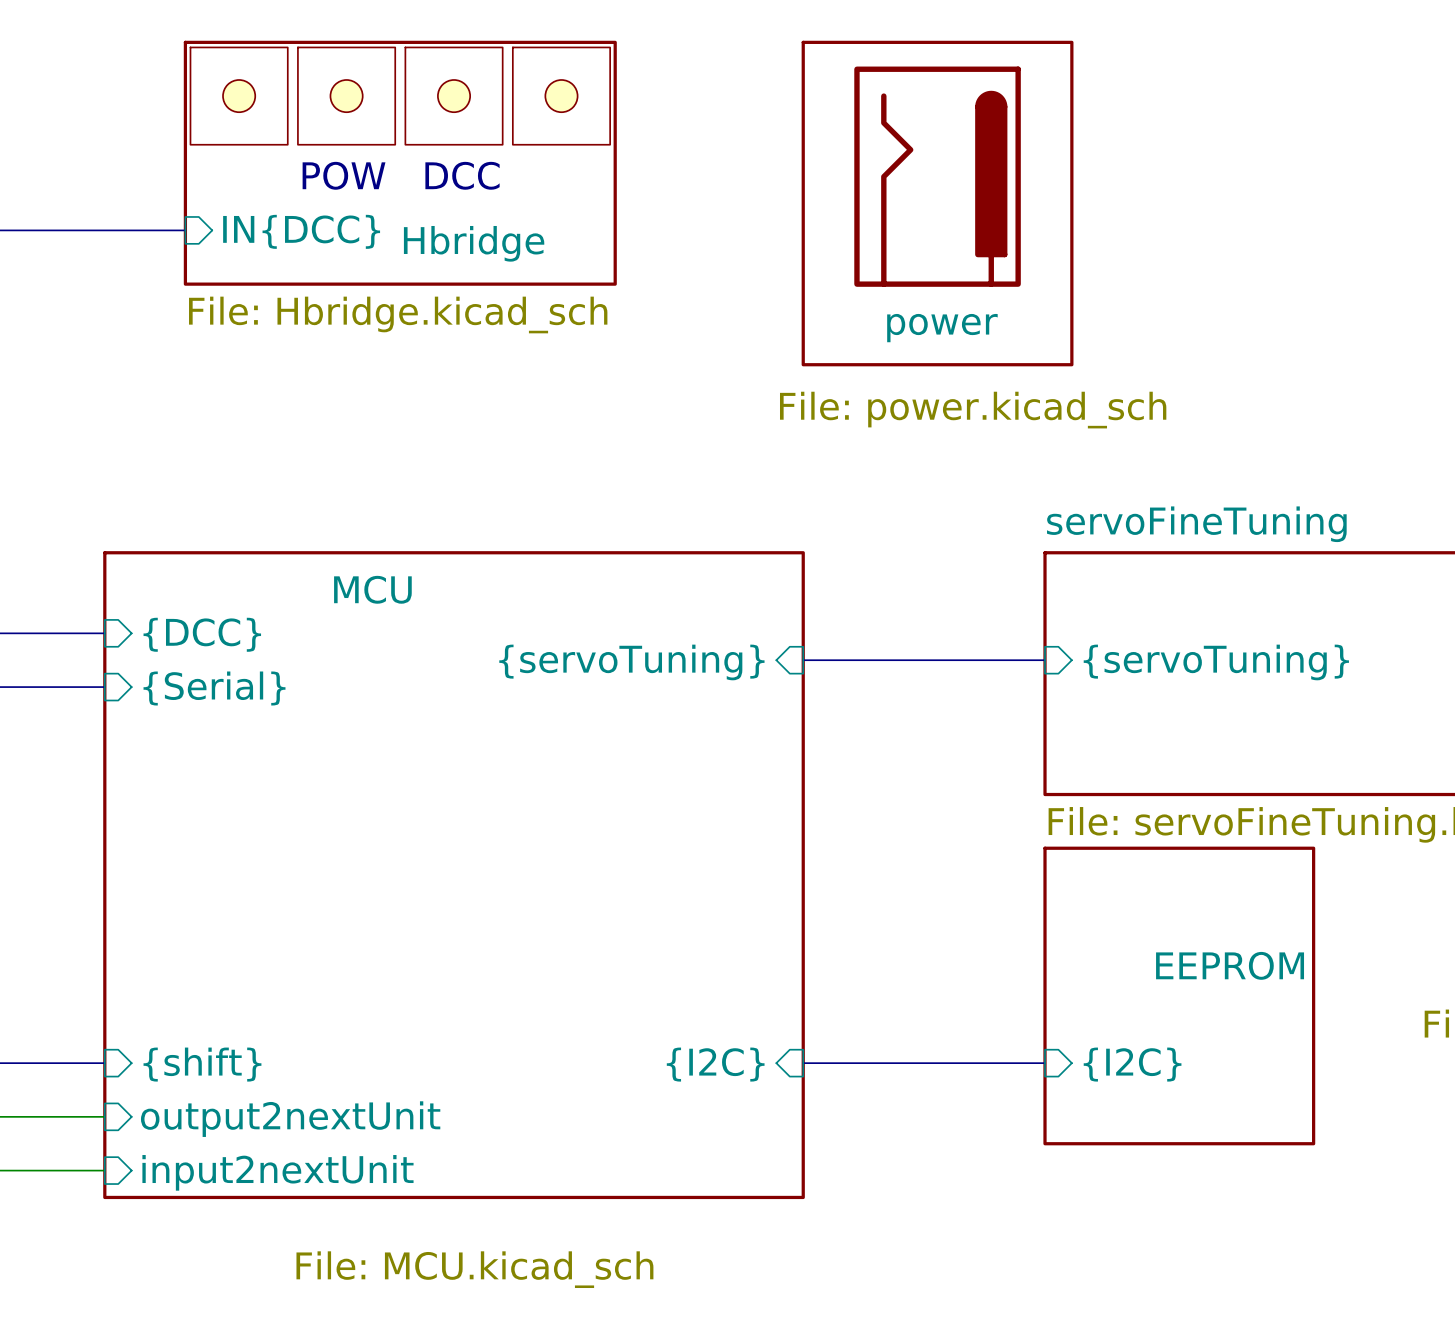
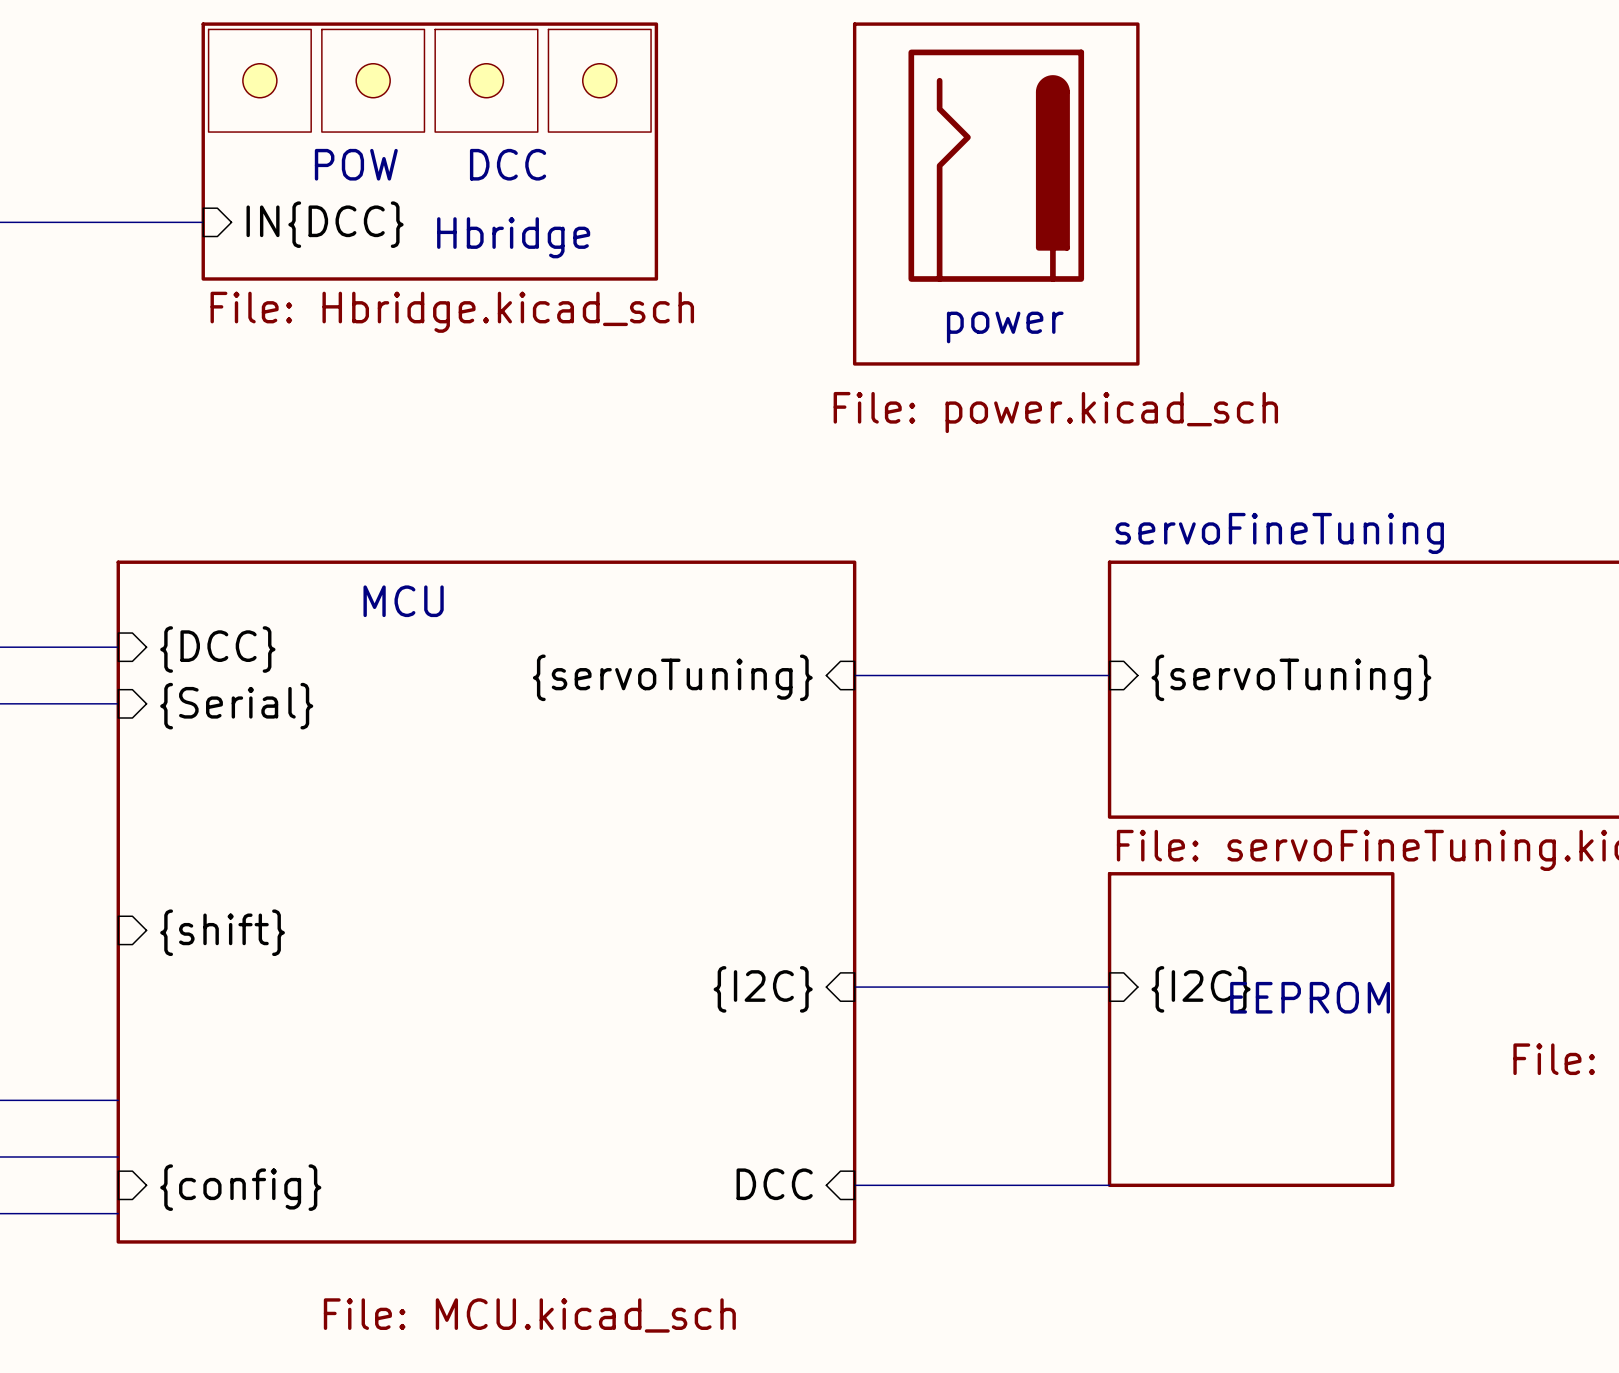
bus: (803, 1063) (1045, 1063) -> (854, 987) (1109, 987)
sheet pin position: {shift} (202, 1064) -> {shift} (222, 932)
sheet pin position: {I2C} (715, 1064) -> {I2C} (763, 989)
sheet pin position: {I2C} (1132, 1064) -> {I2C} (1201, 989)
sheet pin: output2nextUnit (290, 1119) -> none
sheet pin: none -> DCC (774, 1184)
wire: none -> (854, 1185) (1109, 1185)
sheet pin: none -> {config} (240, 1187)
sheet pin: input2nextUnit (277, 1172) -> none

